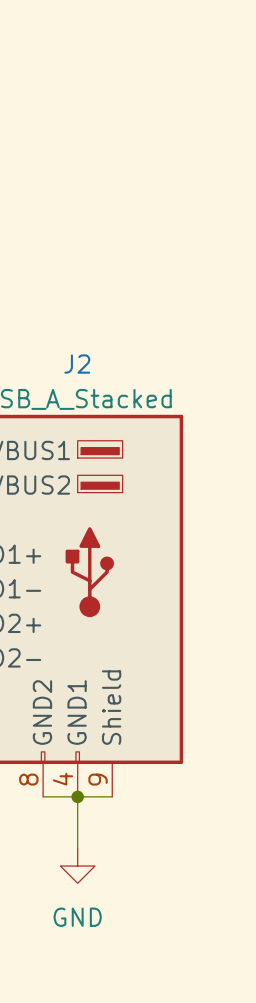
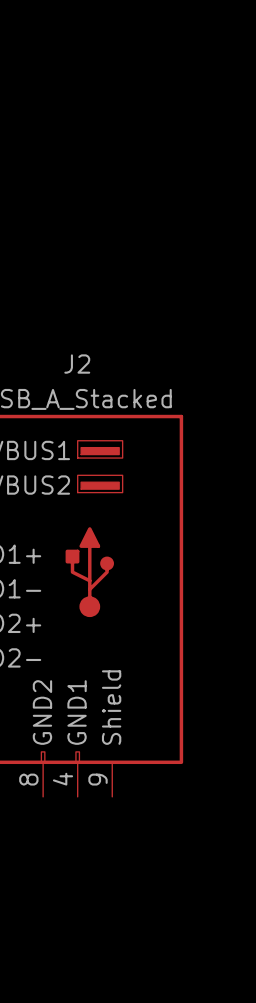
wire: (43, 796) (112, 796) -> none
wire: (77, 796) (77, 848) -> none
junction: (77, 796) -> none
power symbol: GND (77, 866) -> none

